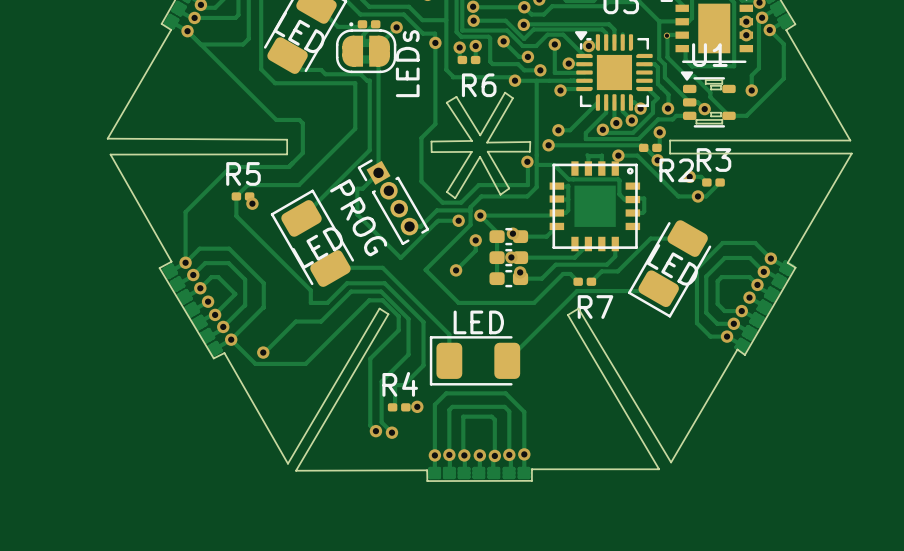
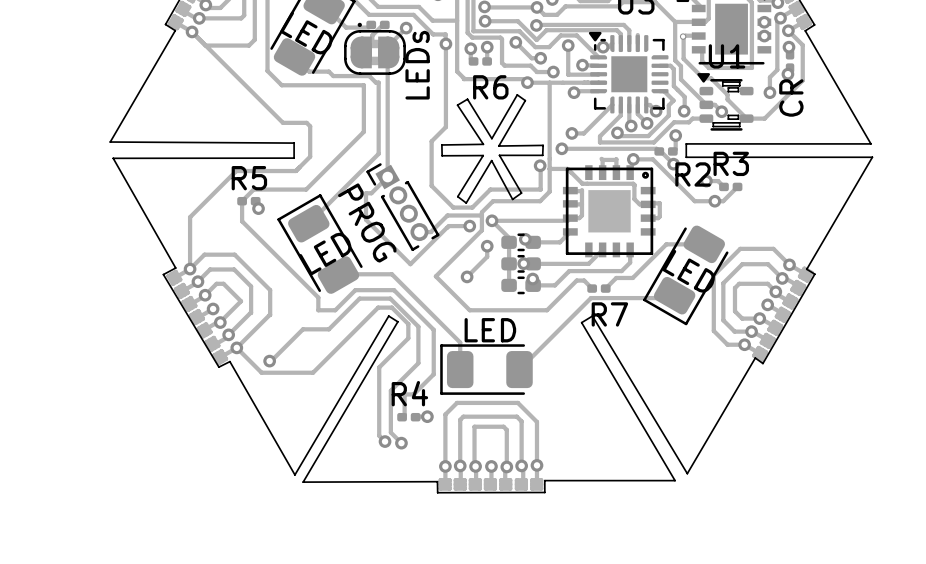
via: none -> (788, 47)
CR: none -> (790, 61)
via: none -> (787, 74)

